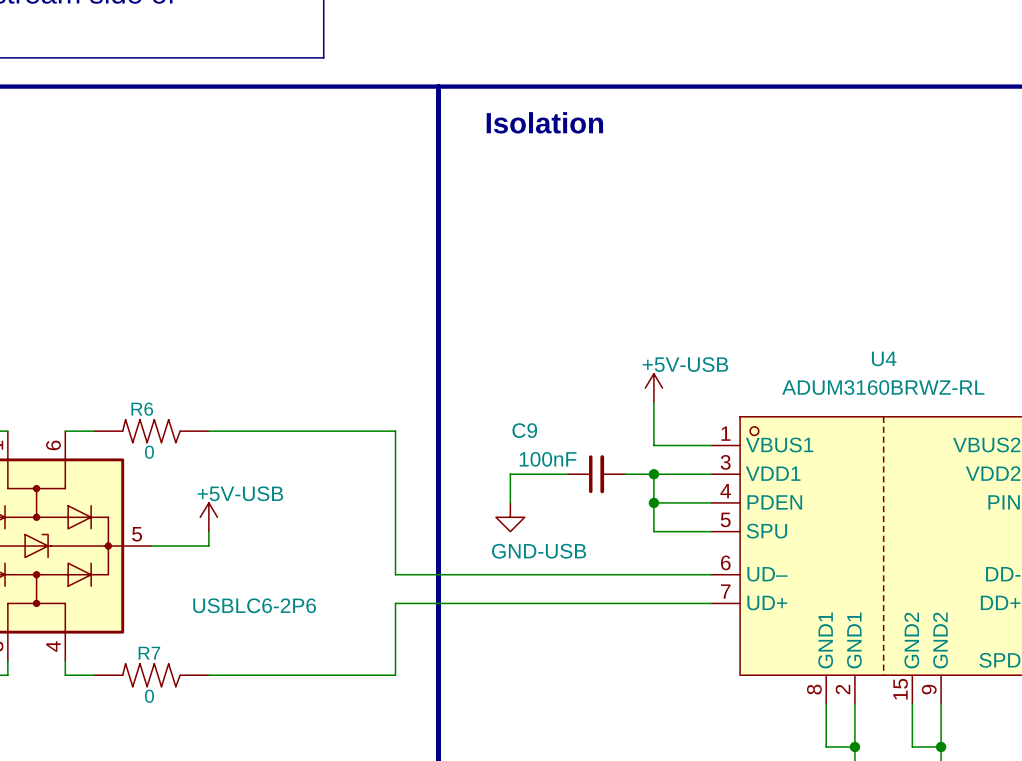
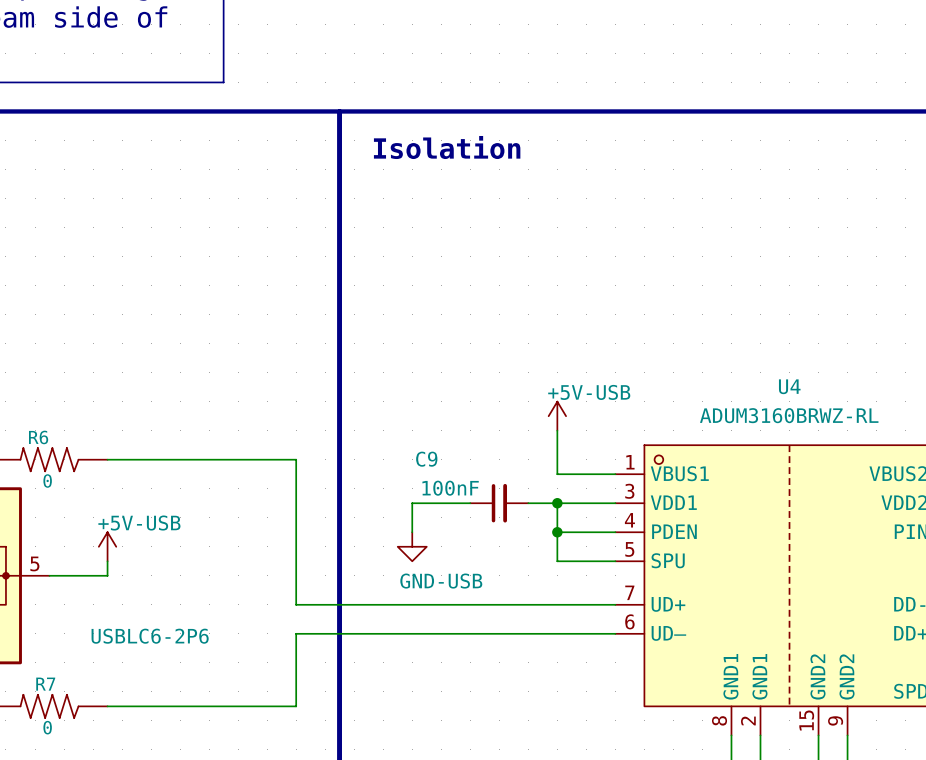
U4 pin number: 6 (725, 562) -> 7 (629, 592)
U4 pin name: UD– (767, 574) -> UD+ (668, 604)
U4 pin number: 7 (725, 591) -> 6 (629, 621)
U4 pin name: UD+ (767, 603) -> UD– (668, 633)

